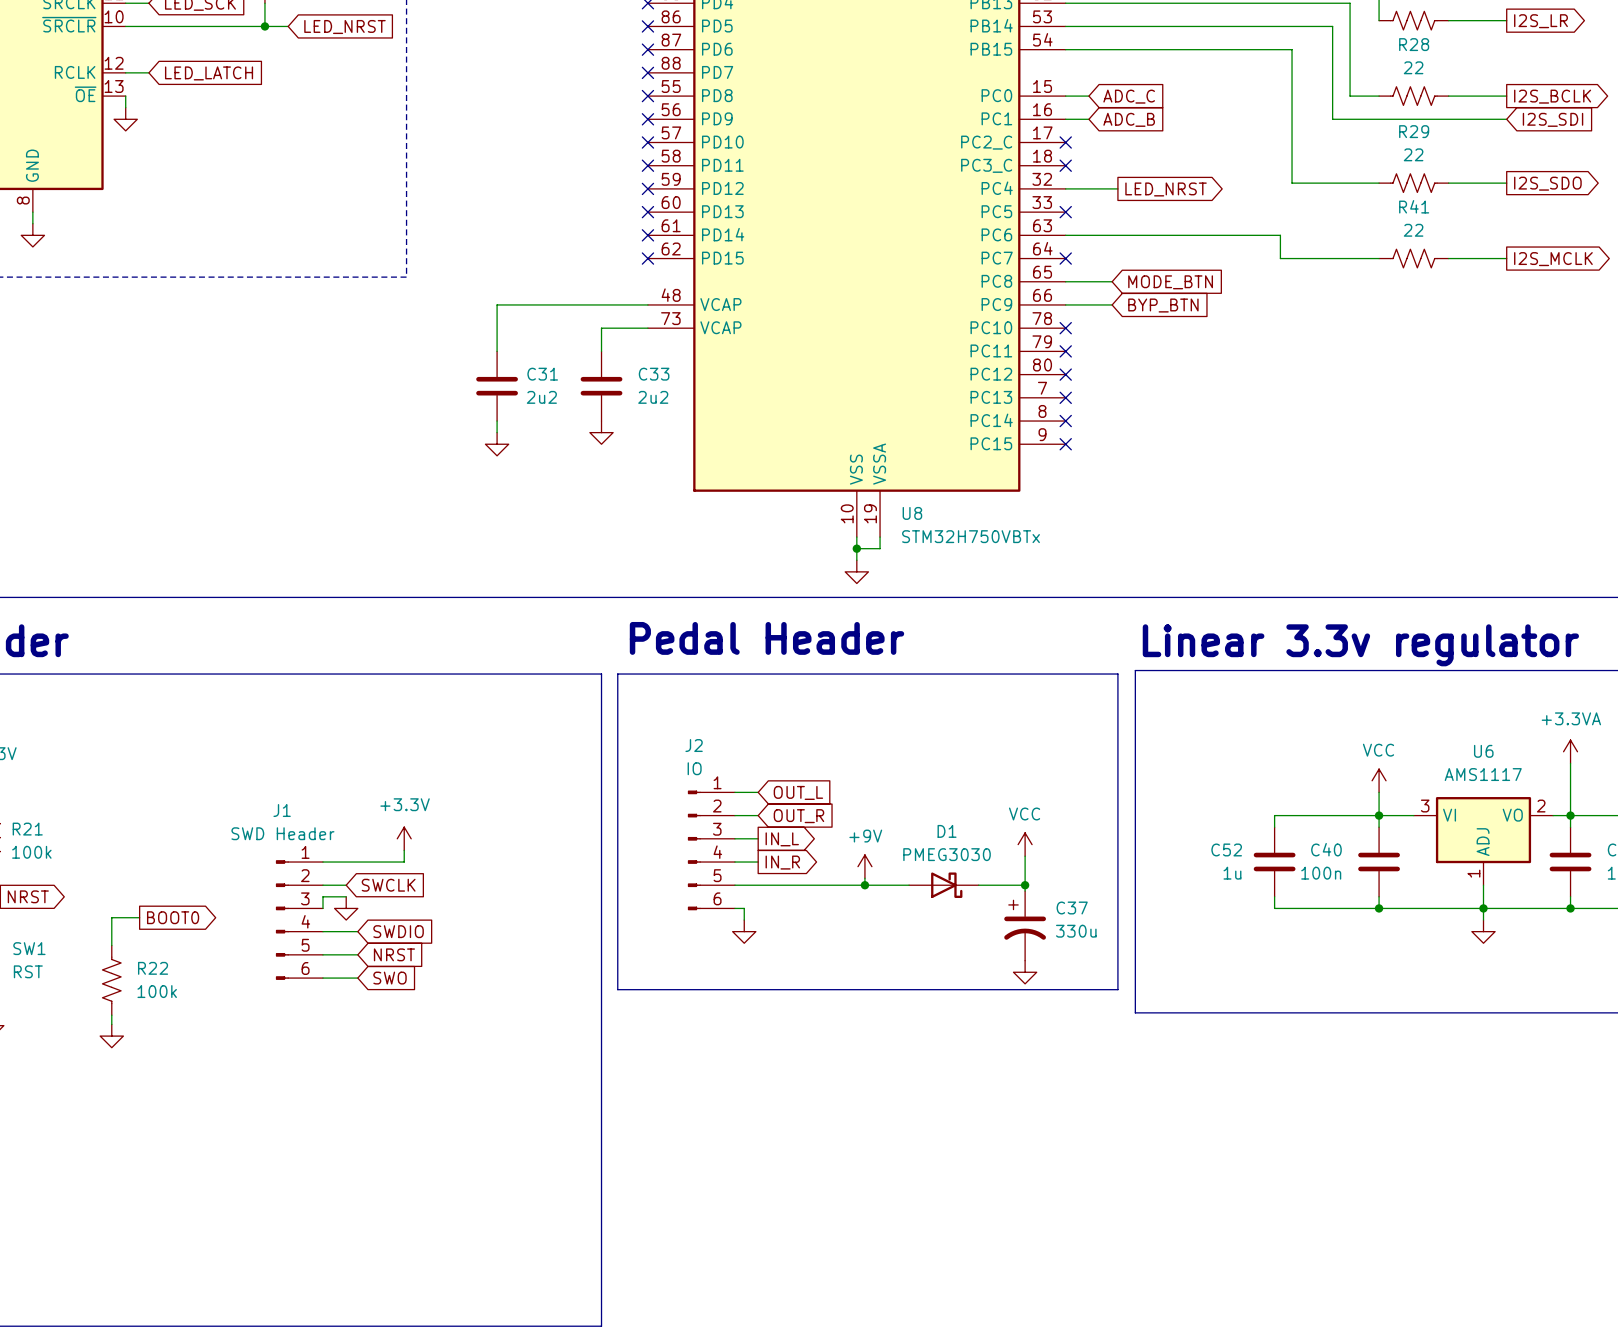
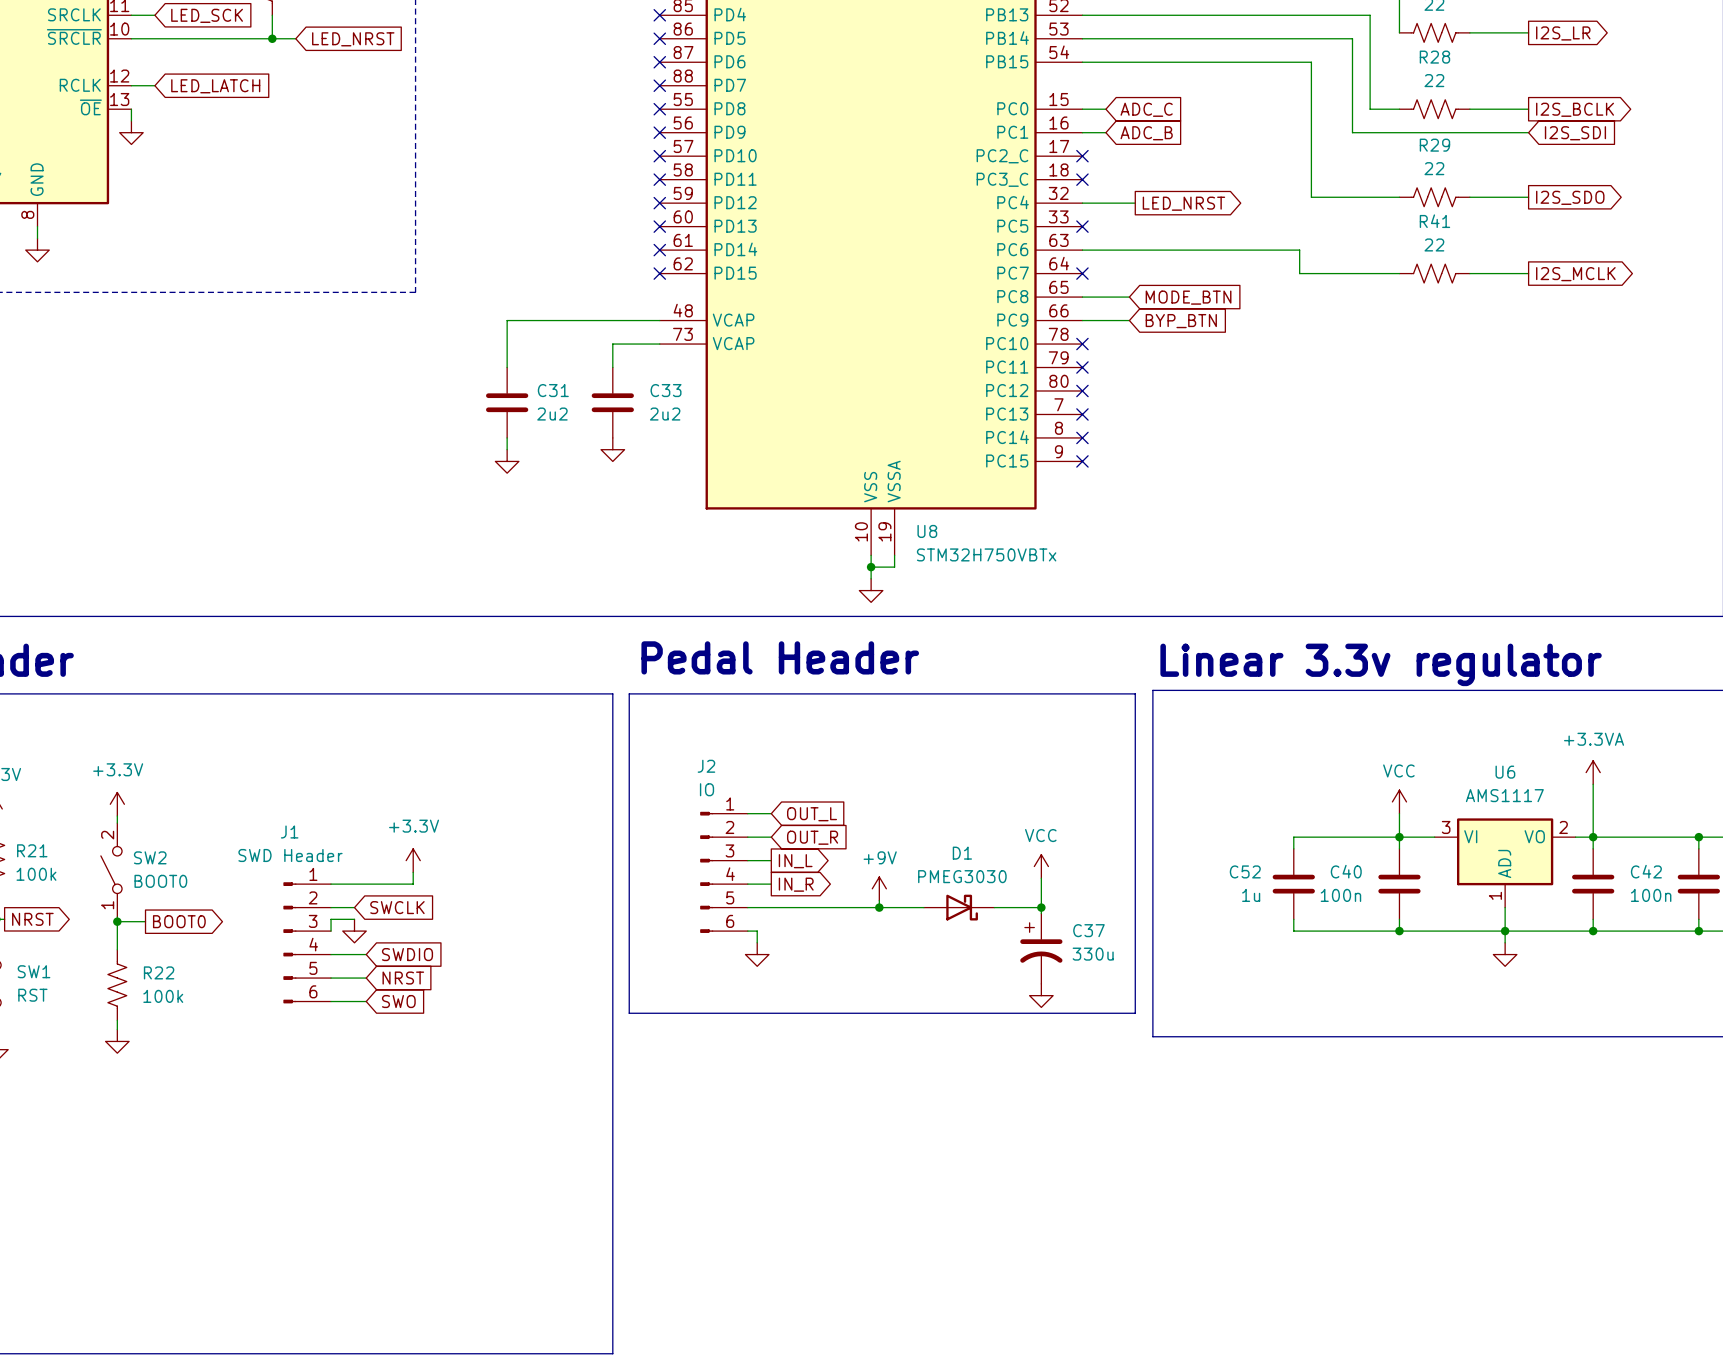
power symbol: none -> +3.3V (117, 804)
wire: none -> (117, 816) (117, 823)
SW2: none -> BOOT0 (111, 870)
wire: none -> (117, 921) (145, 921)
junction: none -> (117, 921)
wire: (111, 917) (139, 917) -> (117, 940) (117, 916)
global label position: BOOT0 (173, 917) -> BOOT0 (179, 921)
R22 position: (111, 980) -> (117, 985)
power symbol position: (111, 1036) -> (117, 1041)

